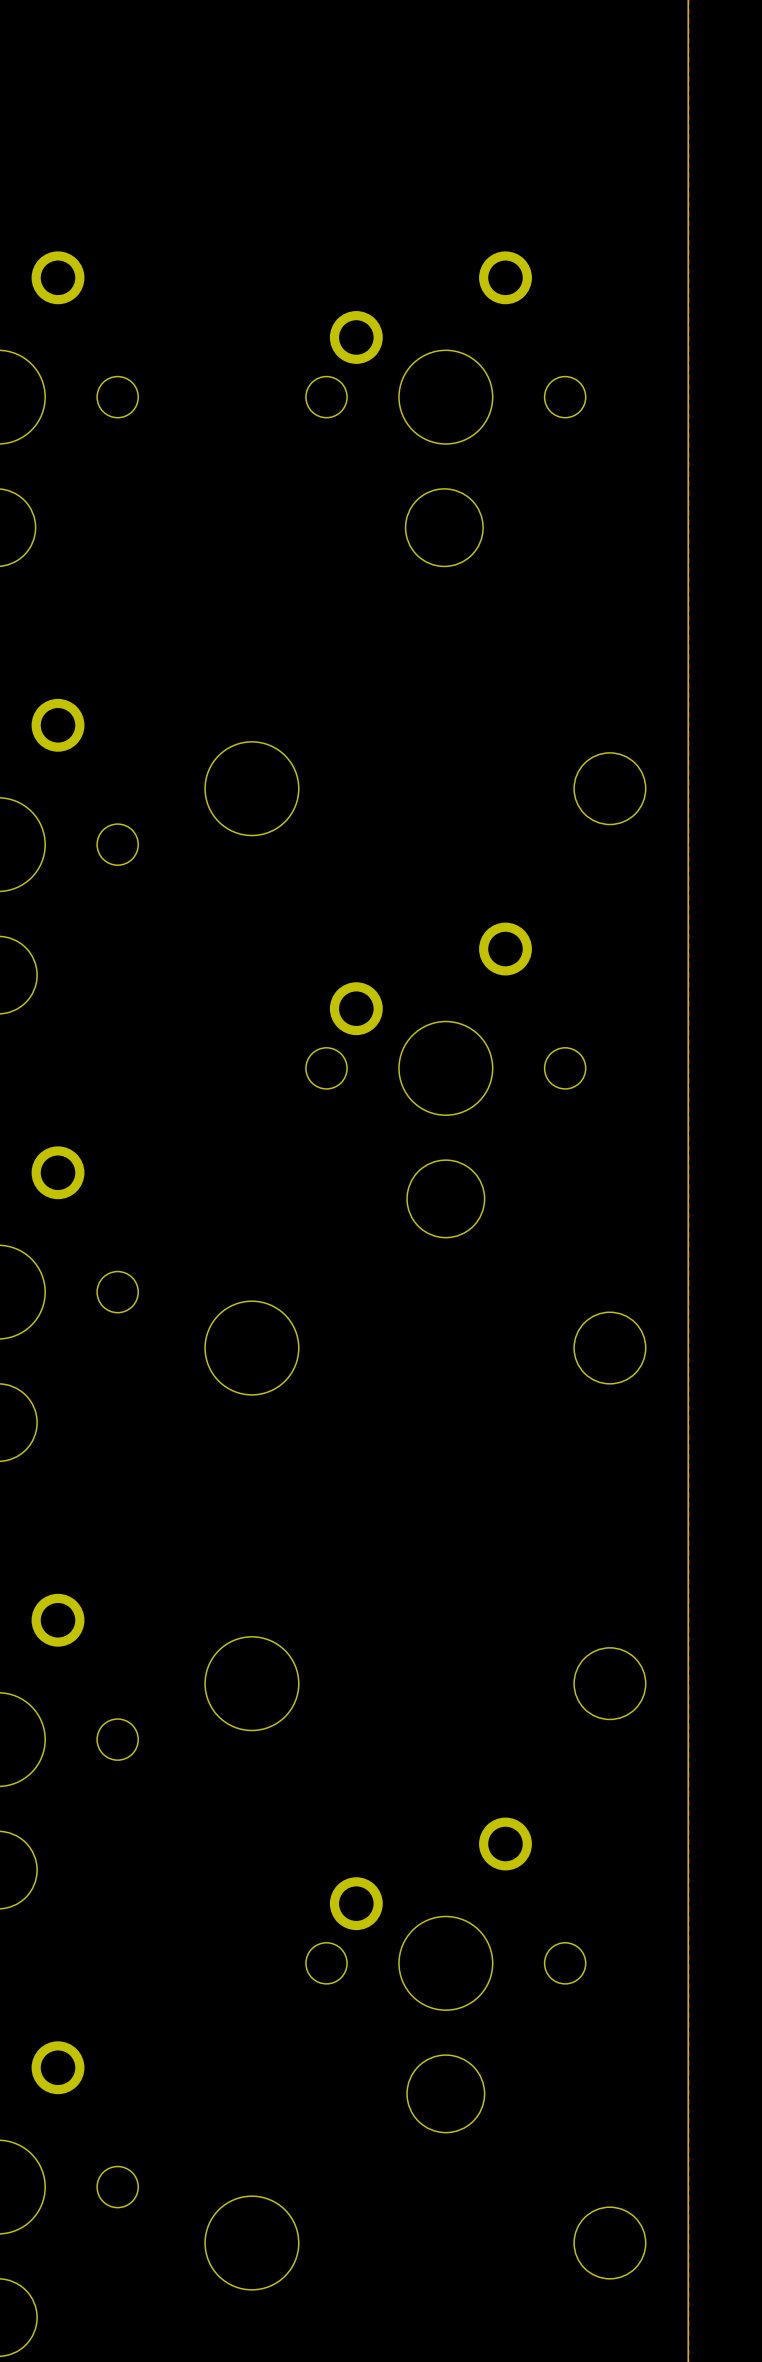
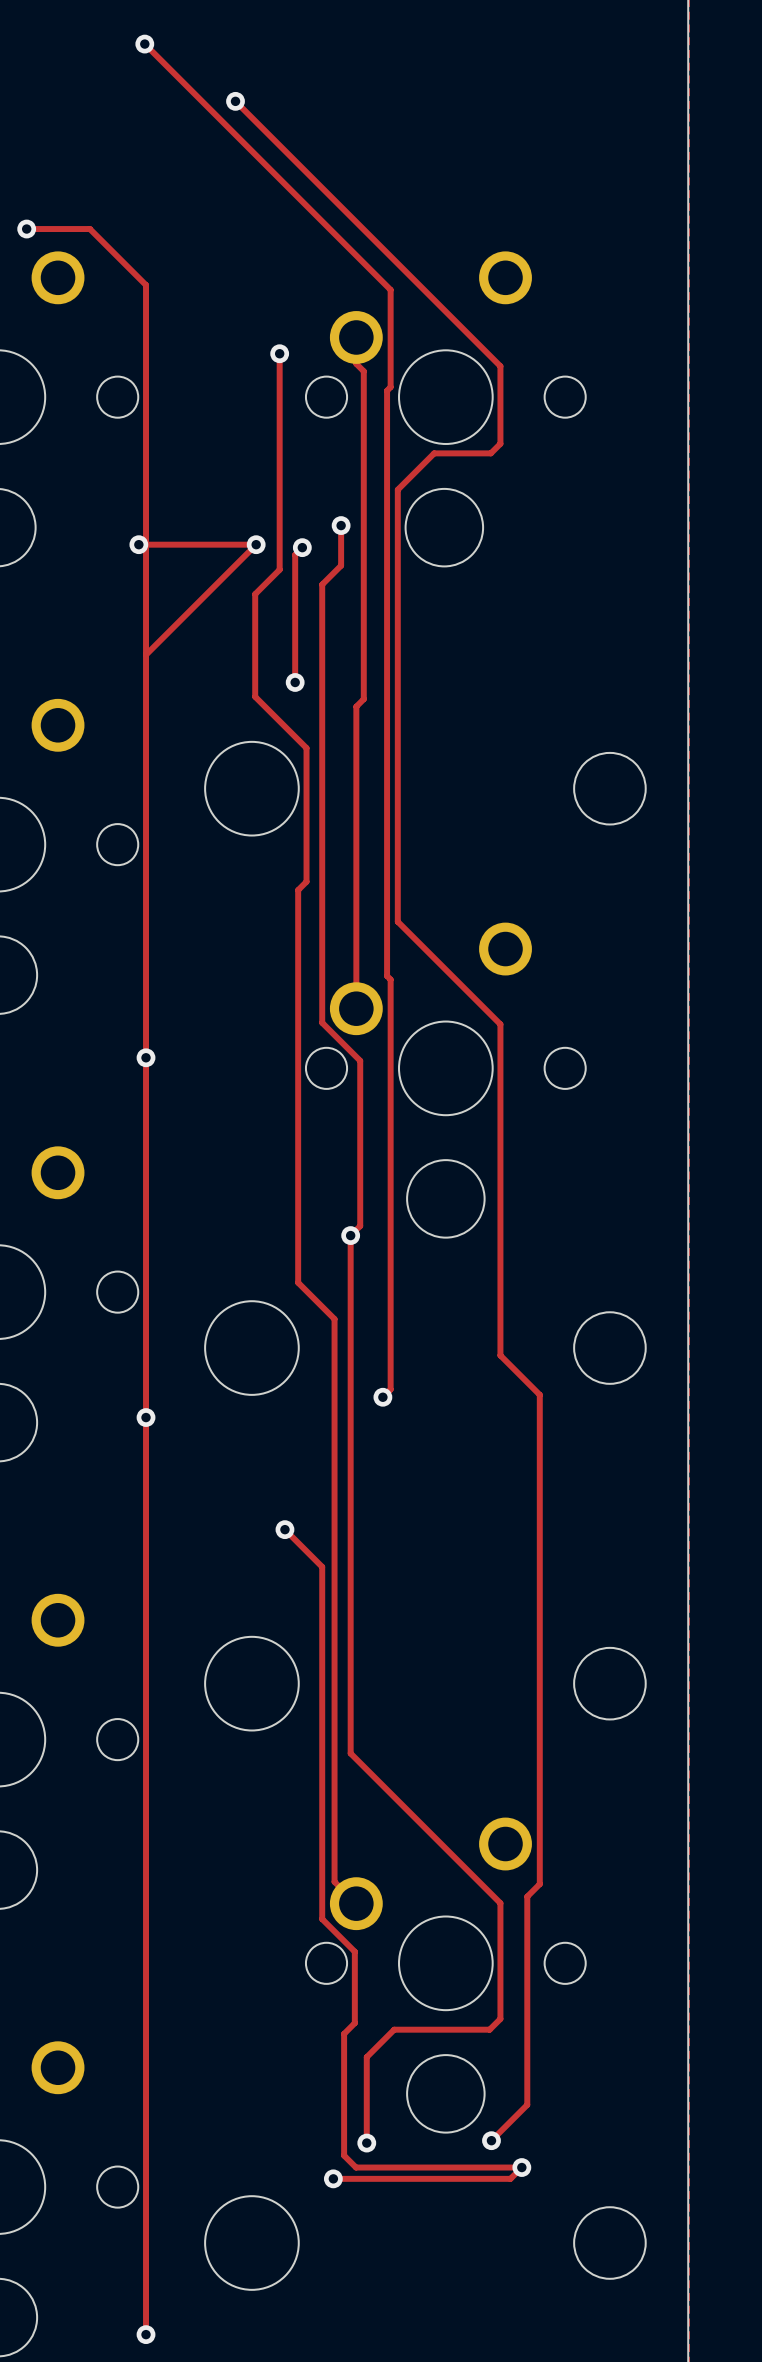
track: none -> (144, 44) (390, 289) (390, 387) (387, 390) (387, 976) (390, 979) (390, 1389) (382, 1397)
via: none -> (144, 44)
track: none -> (235, 101) (500, 366) (500, 443) (490, 453) (434, 453) (397, 489) (397, 921) (500, 1024) (500, 1355) (539, 1394) (539, 1884) (527, 1896) (527, 2104) (491, 2140)
via: none -> (235, 101)
track: none -> (26, 229) (89, 229) (146, 285) (146, 2334)
via: none -> (26, 229)
track: none -> (356, 337) (356, 363) (363, 371) (363, 699) (356, 706) (356, 1008)
track: none -> (279, 353) (279, 569) (255, 594) (255, 696) (306, 748) (306, 881) (298, 890) (298, 1282) (334, 1319) (334, 1881) (356, 1903)
via: none -> (279, 353)
track: none -> (341, 525) (341, 565) (322, 584) (322, 1022) (360, 1060) (360, 1226) (350, 1235) (350, 1753) (500, 1903) (500, 2018) (489, 2029) (394, 2029) (366, 2057) (366, 2143)
via: none -> (341, 525)
via: none -> (138, 544)
via: none -> (256, 544)
track: none -> (302, 547) (295, 554) (295, 682)
via: none -> (302, 547)
track: none -> (146, 551) (138, 544) (256, 544) (146, 654)
via: none -> (295, 682)
via: none -> (146, 1057)
via: none -> (350, 1235)
via: none -> (382, 1397)
via: none -> (146, 1417)
track: none -> (284, 1529) (322, 1566) (322, 1919) (354, 1951) (354, 2023) (344, 2033) (344, 2155) (356, 2167) (521, 2167) (510, 2178) (333, 2178)
via: none -> (284, 1529)
via: none -> (491, 2140)
via: none -> (366, 2143)
via: none -> (521, 2167)
via: none -> (333, 2178)
via: none -> (146, 2334)

